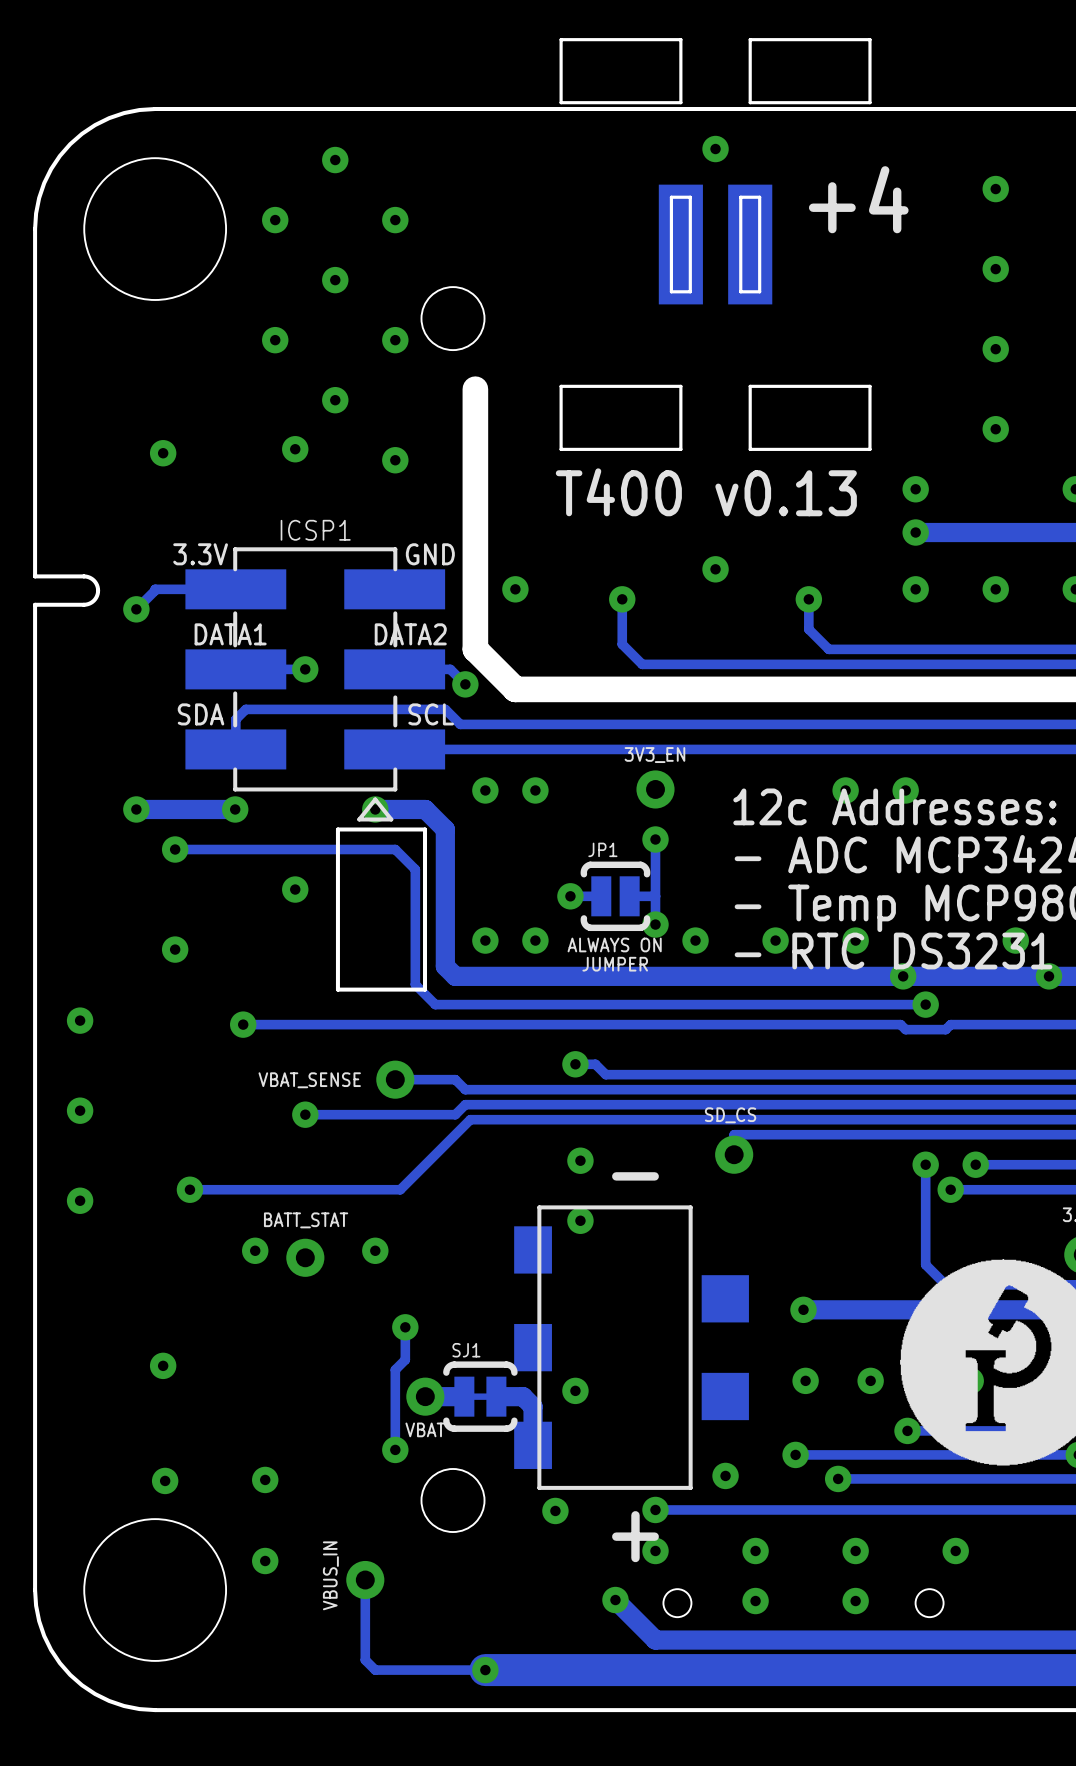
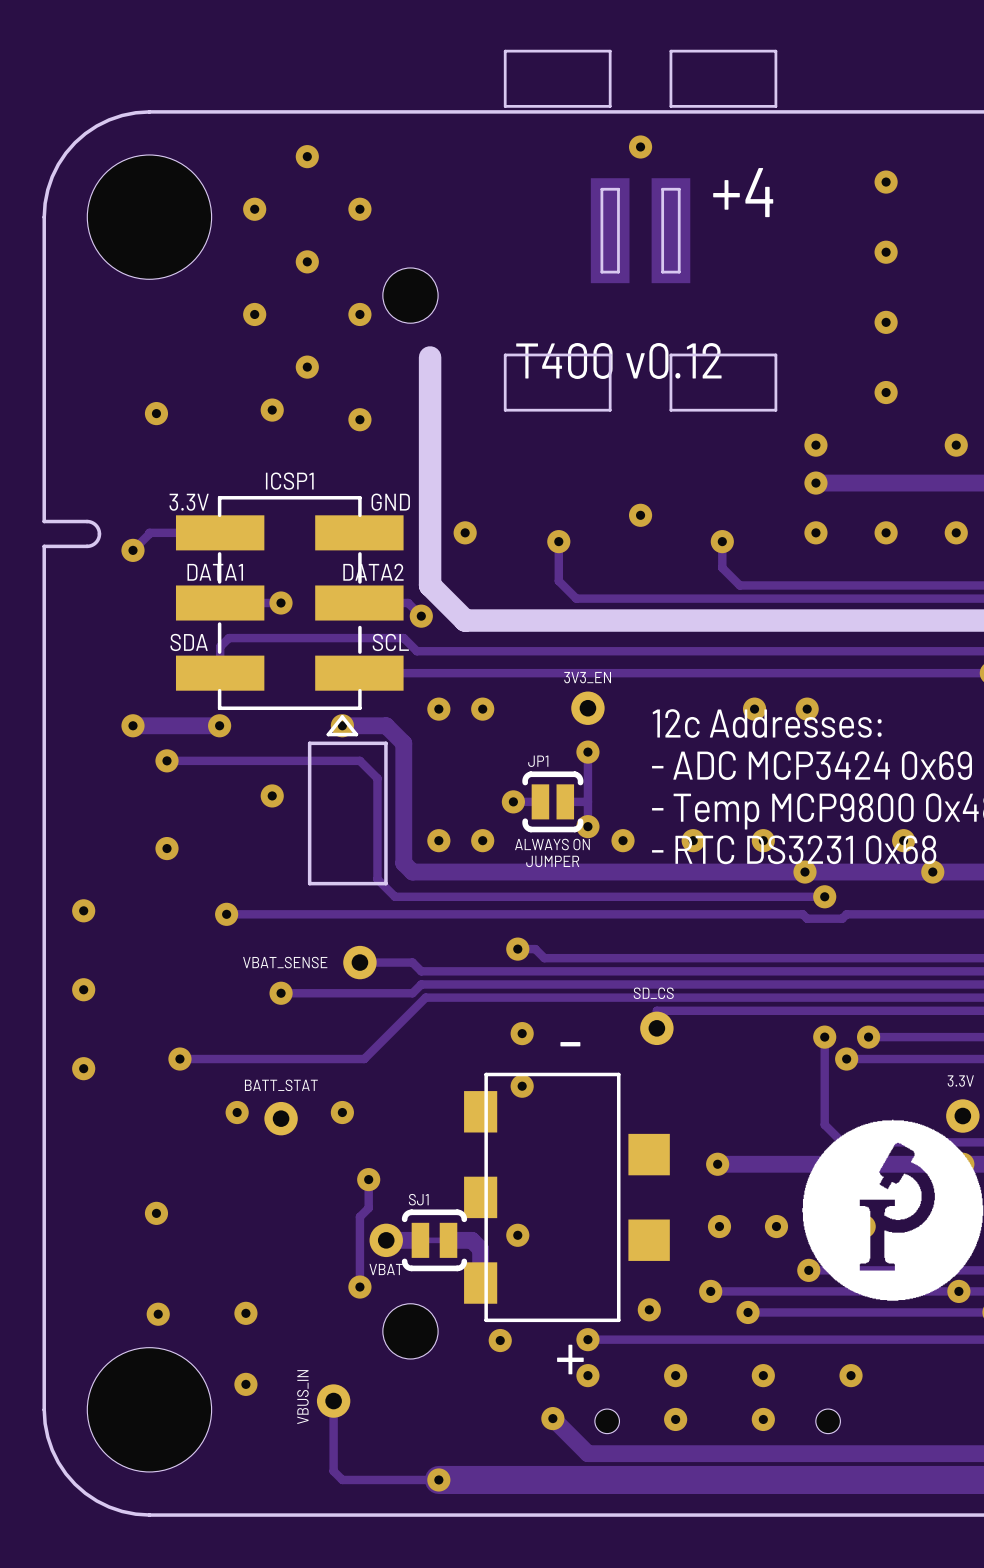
text: none -> T400 v0.12 (618, 360)
text: T400 v0.13 (706, 492) -> none

